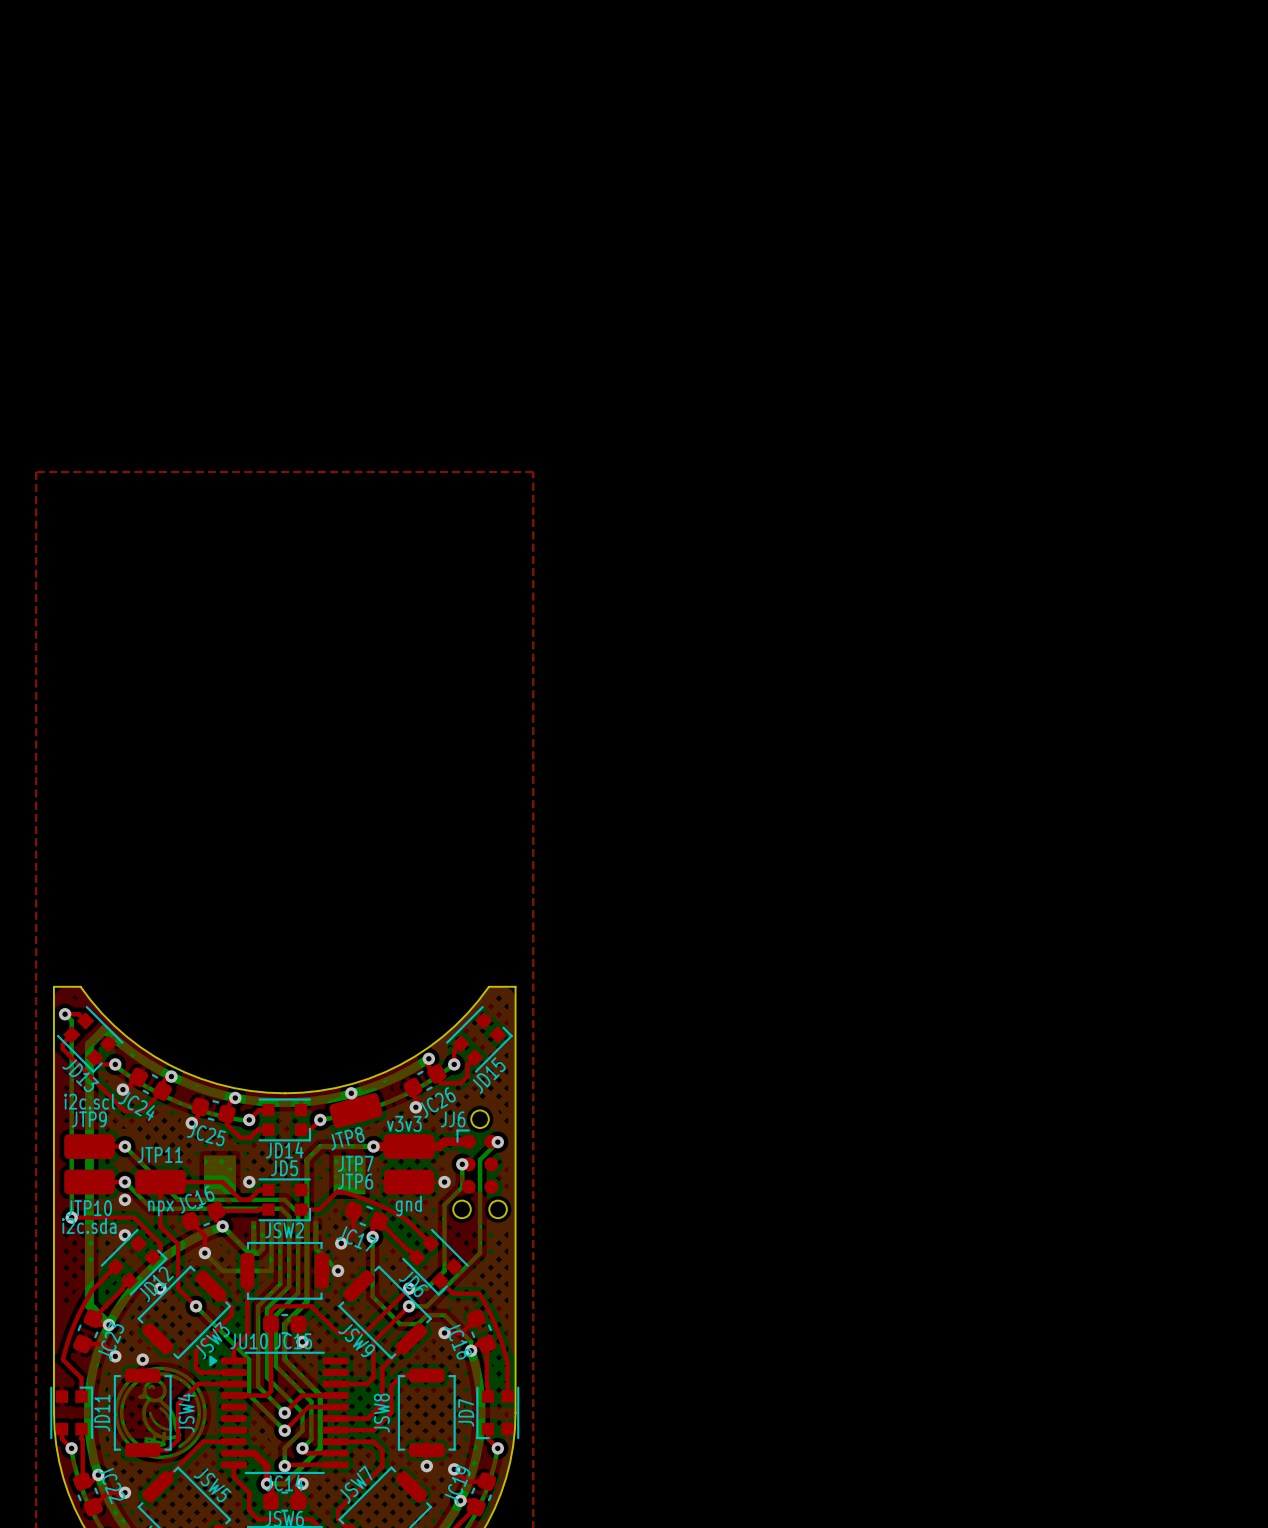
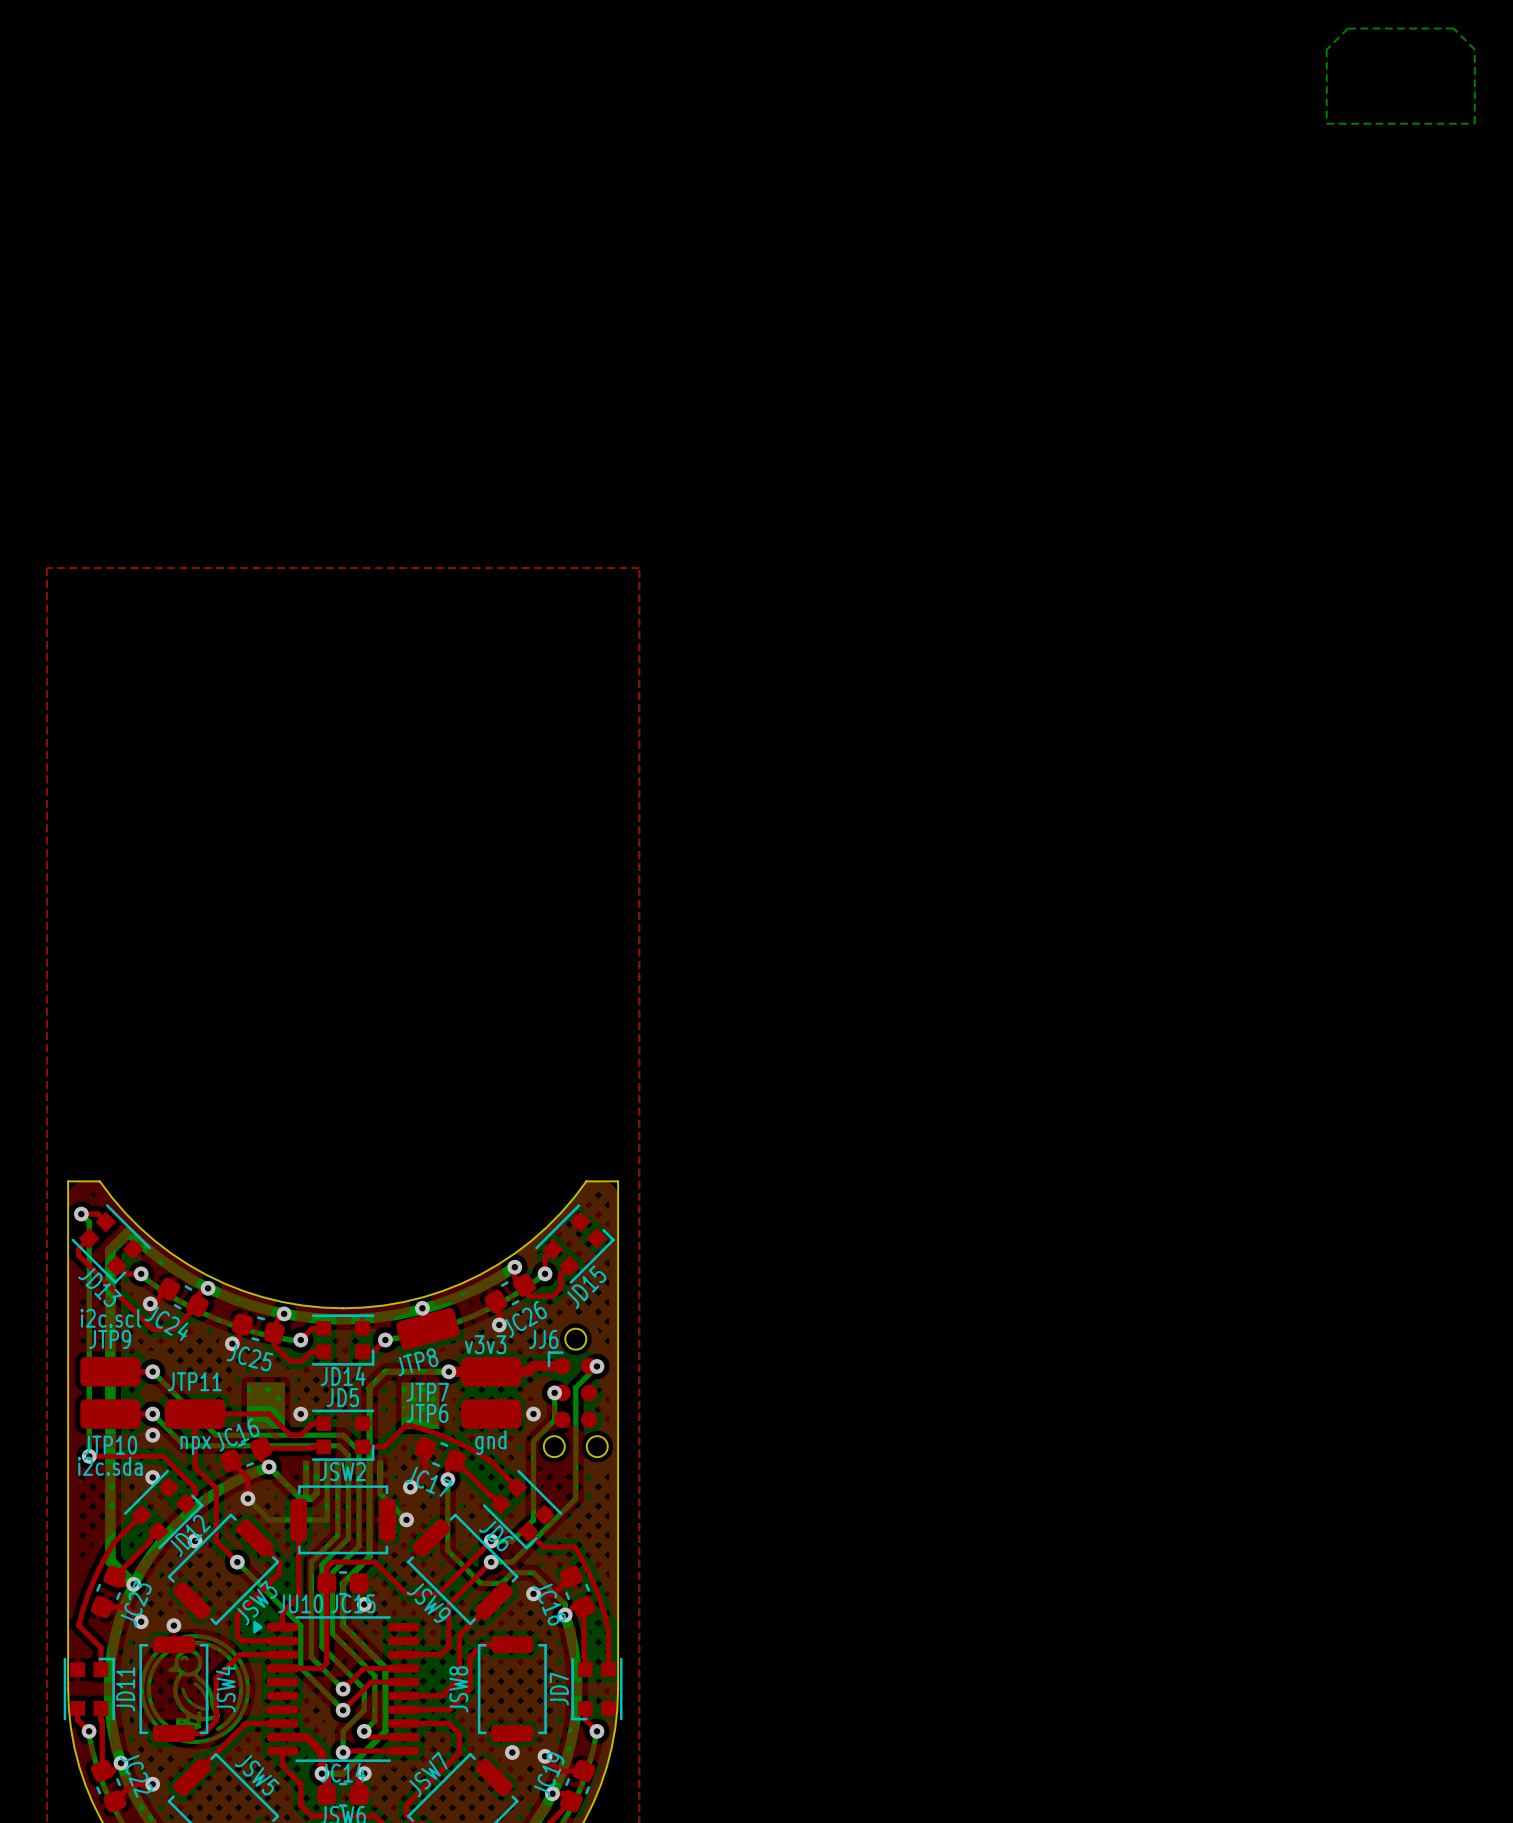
bottom zone outline: none -> (1347, 28) (1453, 28) (1474, 49) (1474, 123) (1326, 123) (1326, 49) (1347, 28)

